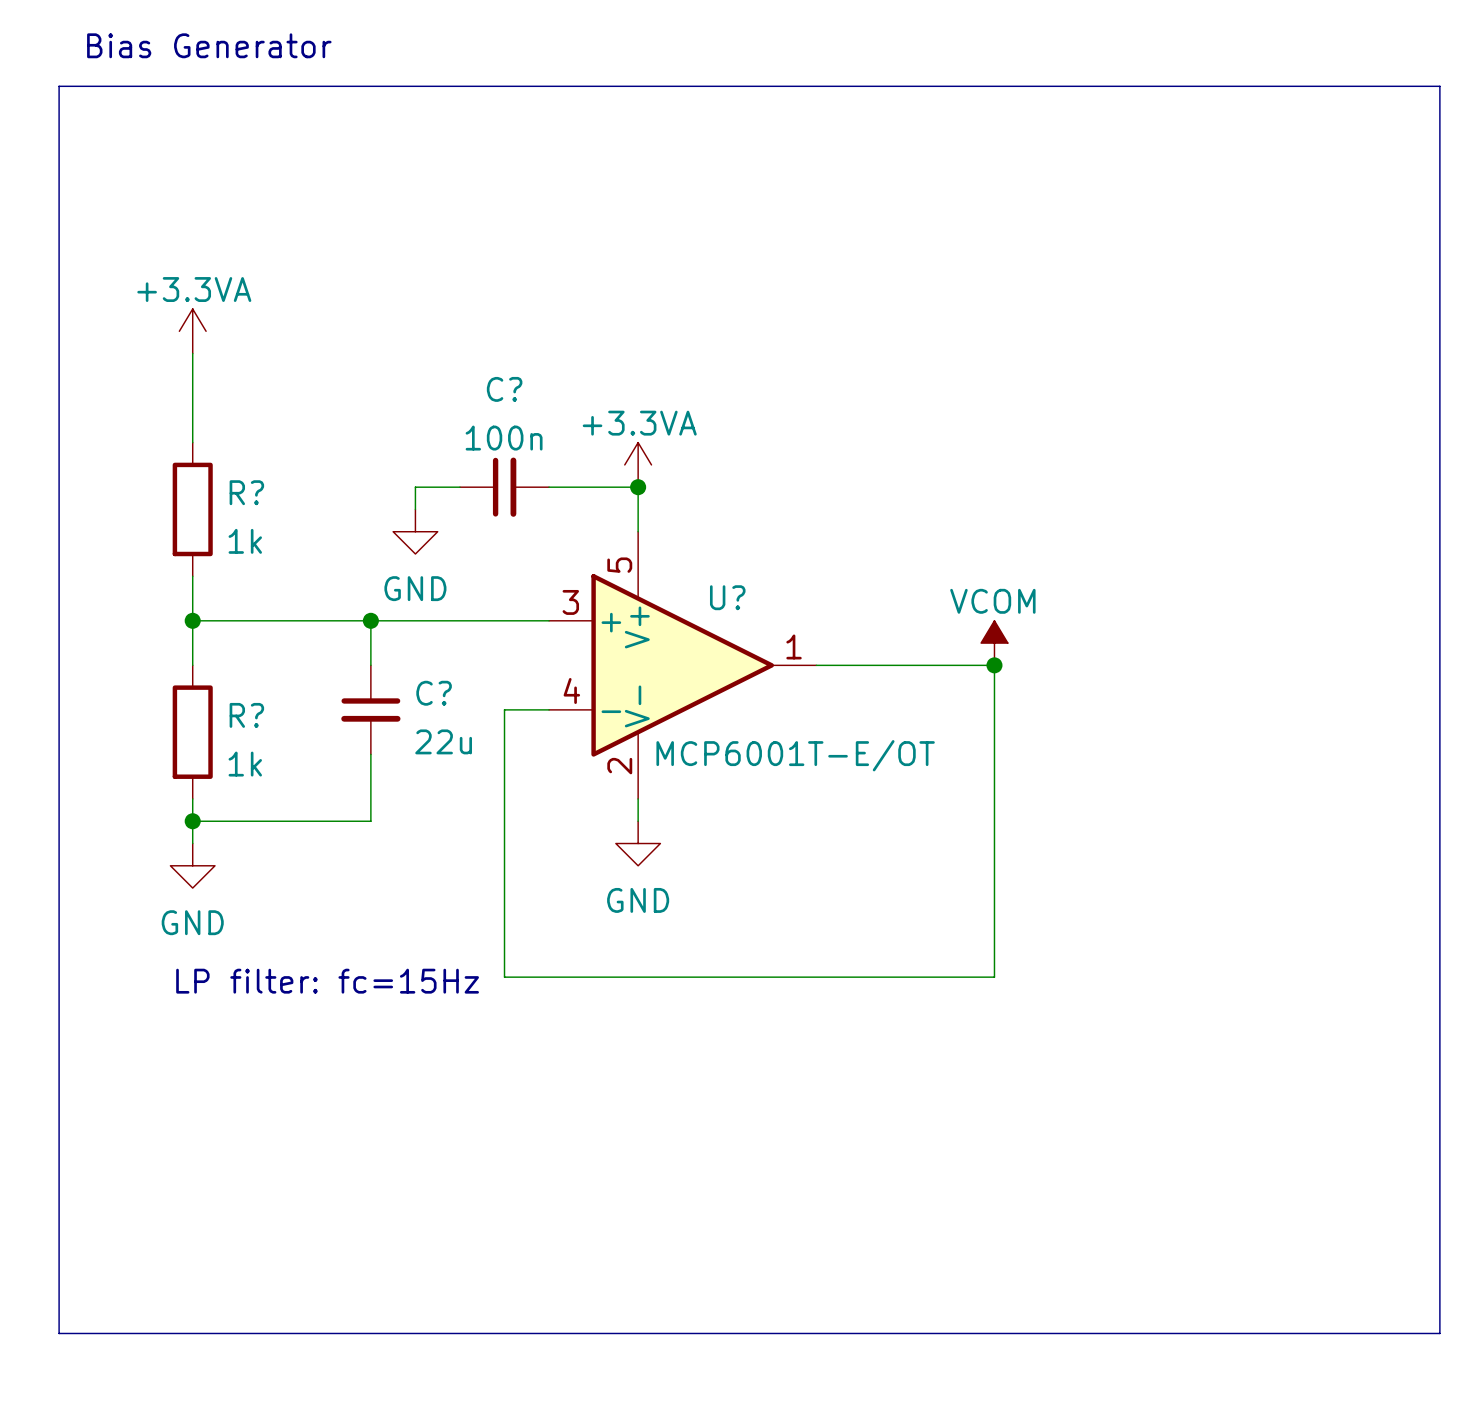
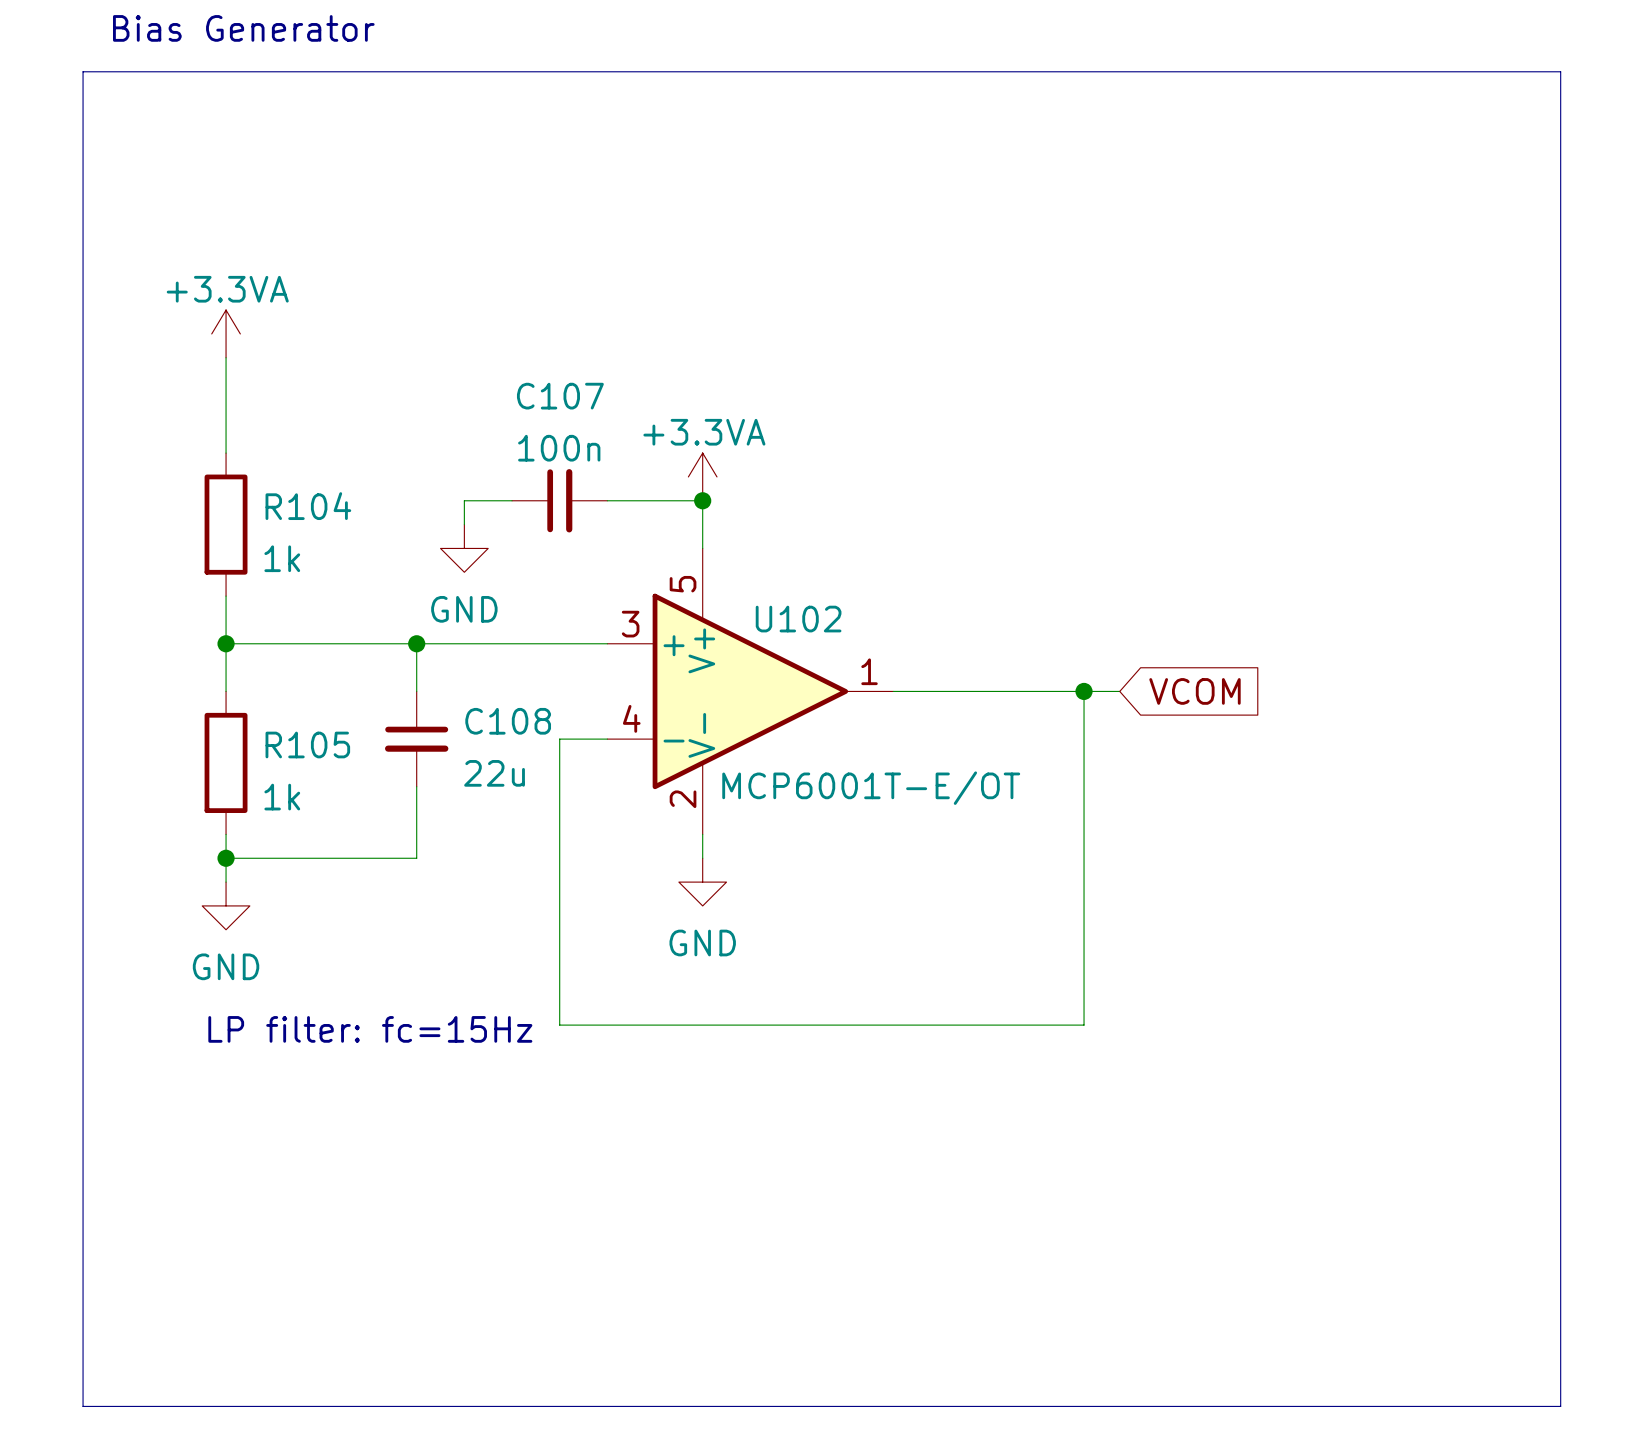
C? name: C? (504, 389) -> C107 (560, 396)
R? name: R? (246, 492) -> R104 (308, 506)
U? name: U? (727, 597) -> U102 (798, 619)
power symbol: VCOM (994, 643) -> none
wire: none -> (1084, 691) (1119, 691)
global label: none -> VCOM (1194, 691)
C? name: C? (434, 693) -> C108 (508, 721)
R? name: R? (246, 715) -> R105 (307, 744)

